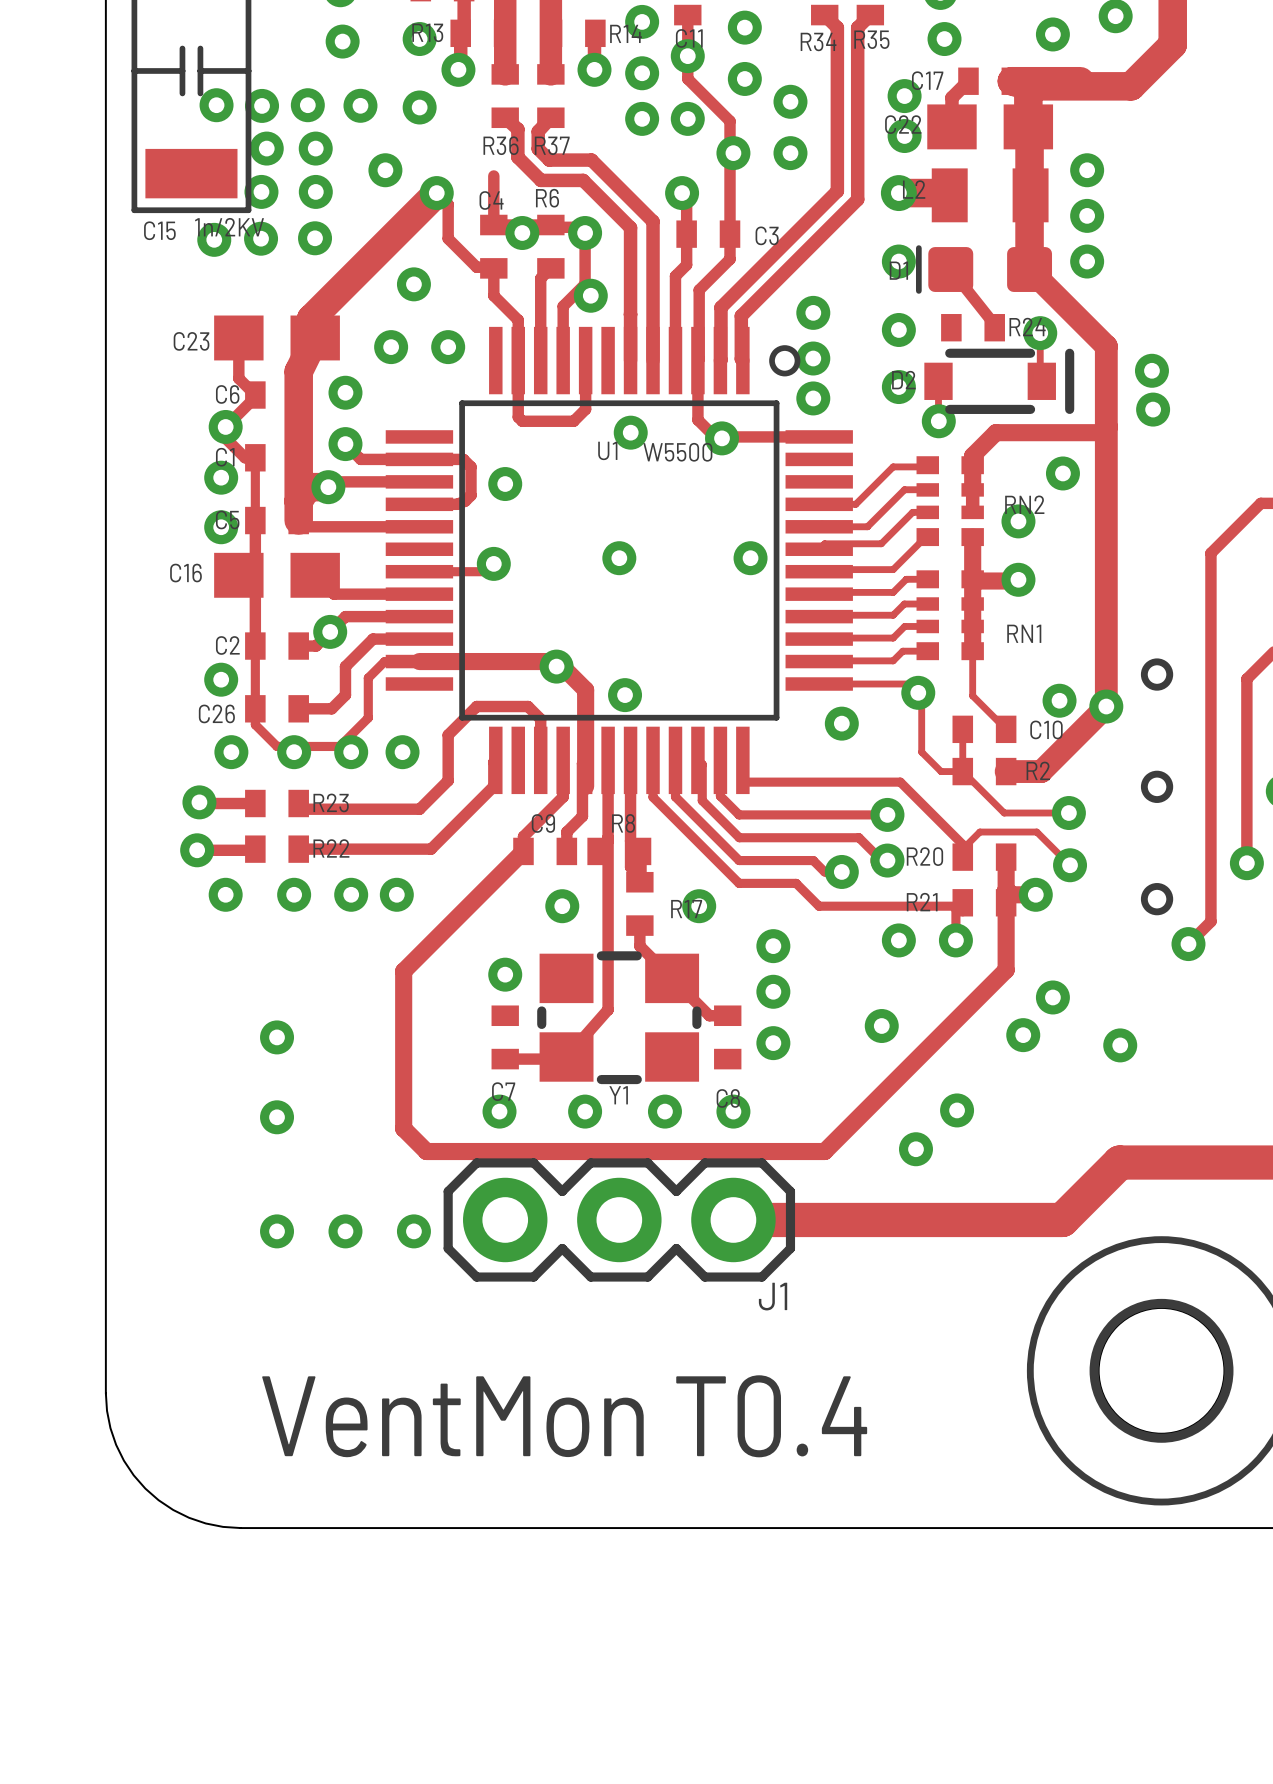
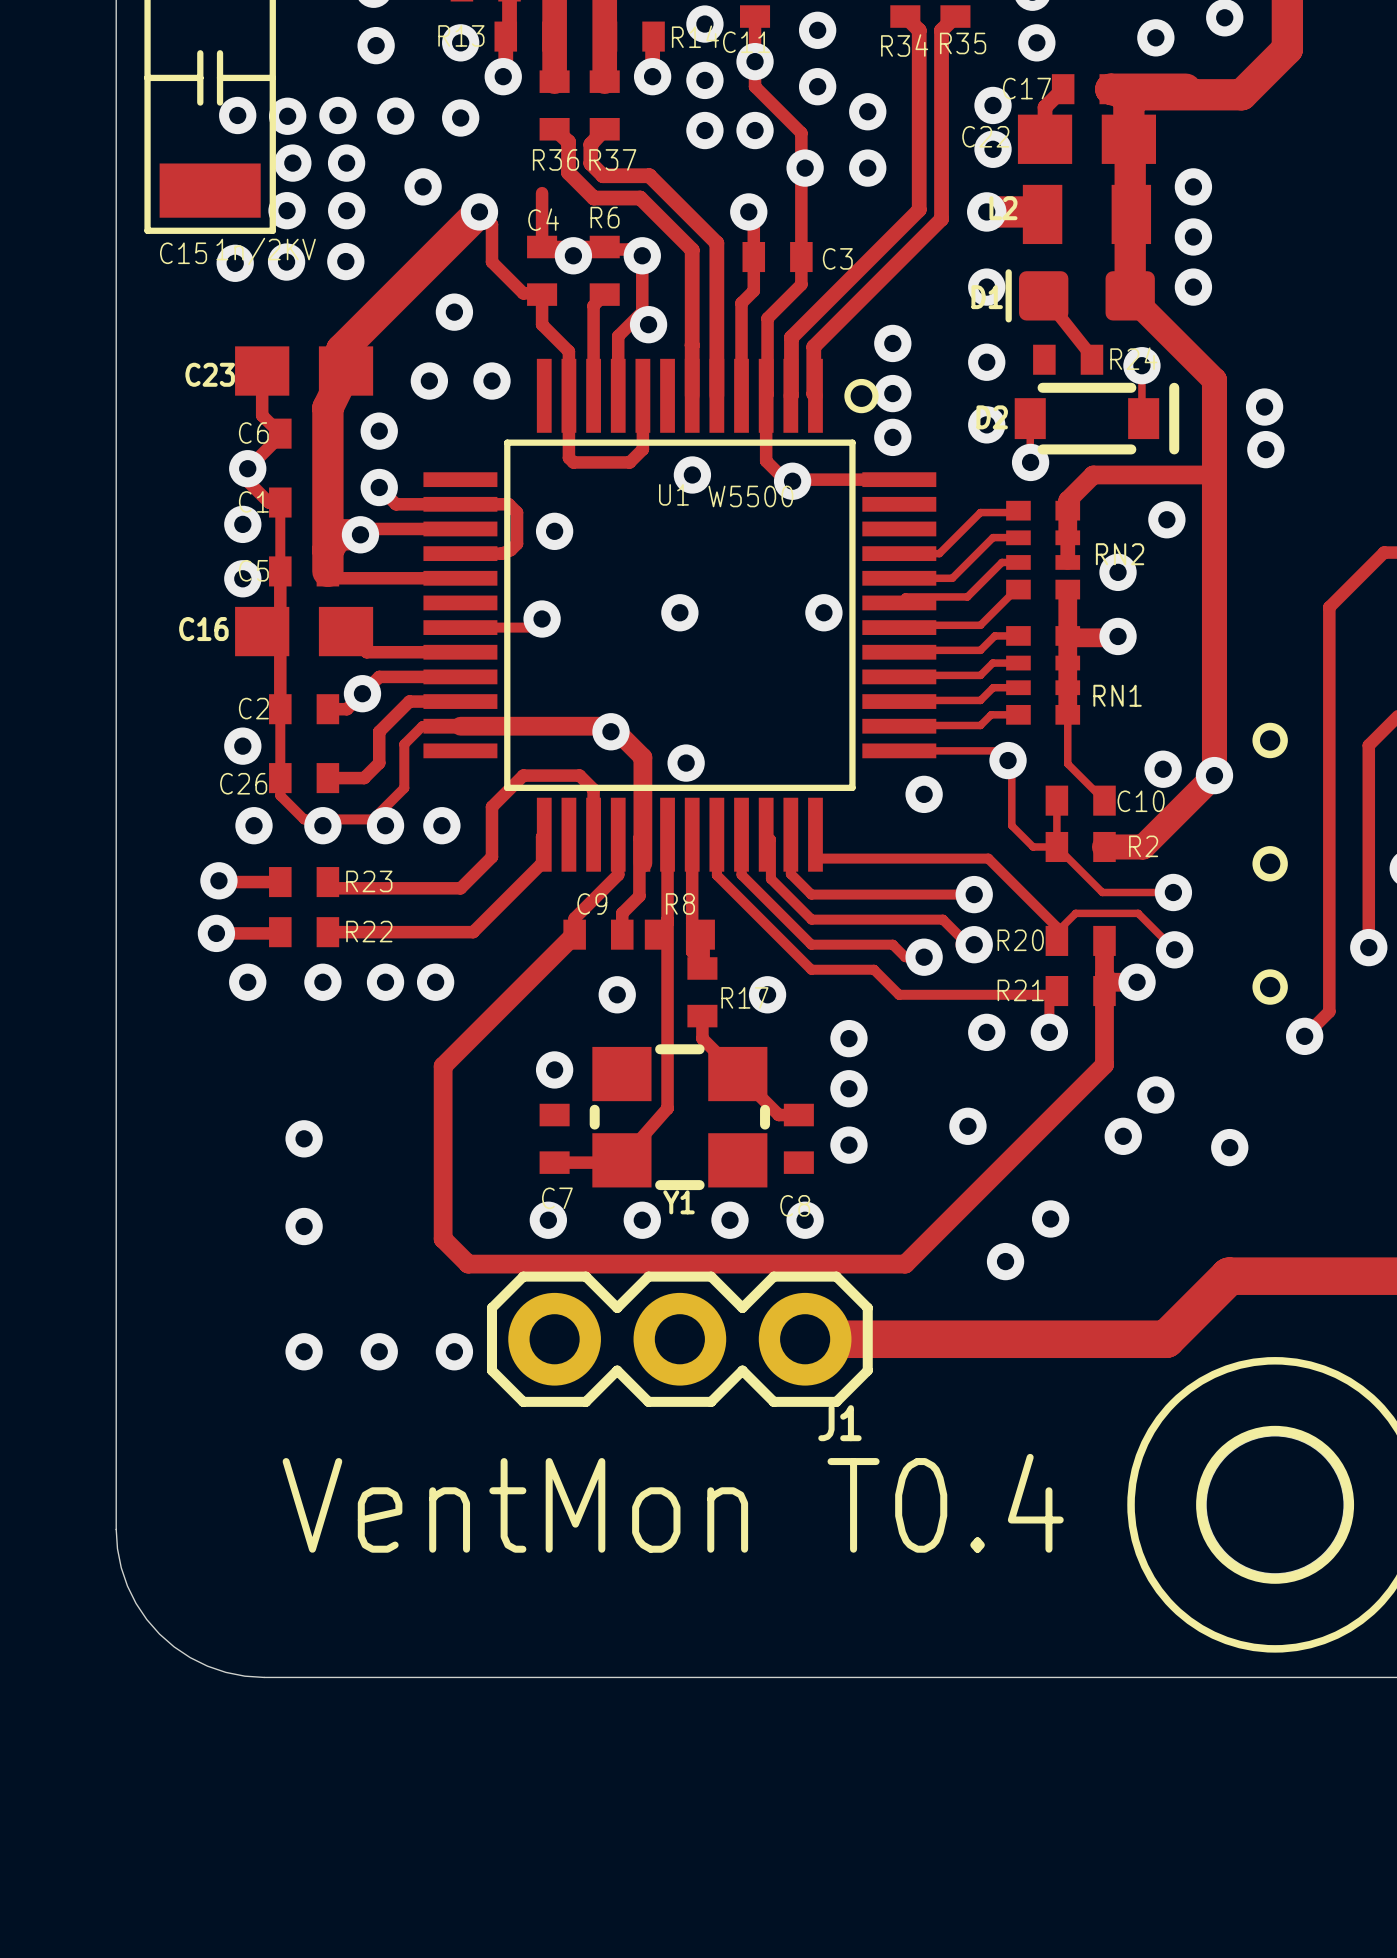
text position: VentMon T0.4 (564, 1416) -> VentMon T0.4 (673, 1503)

